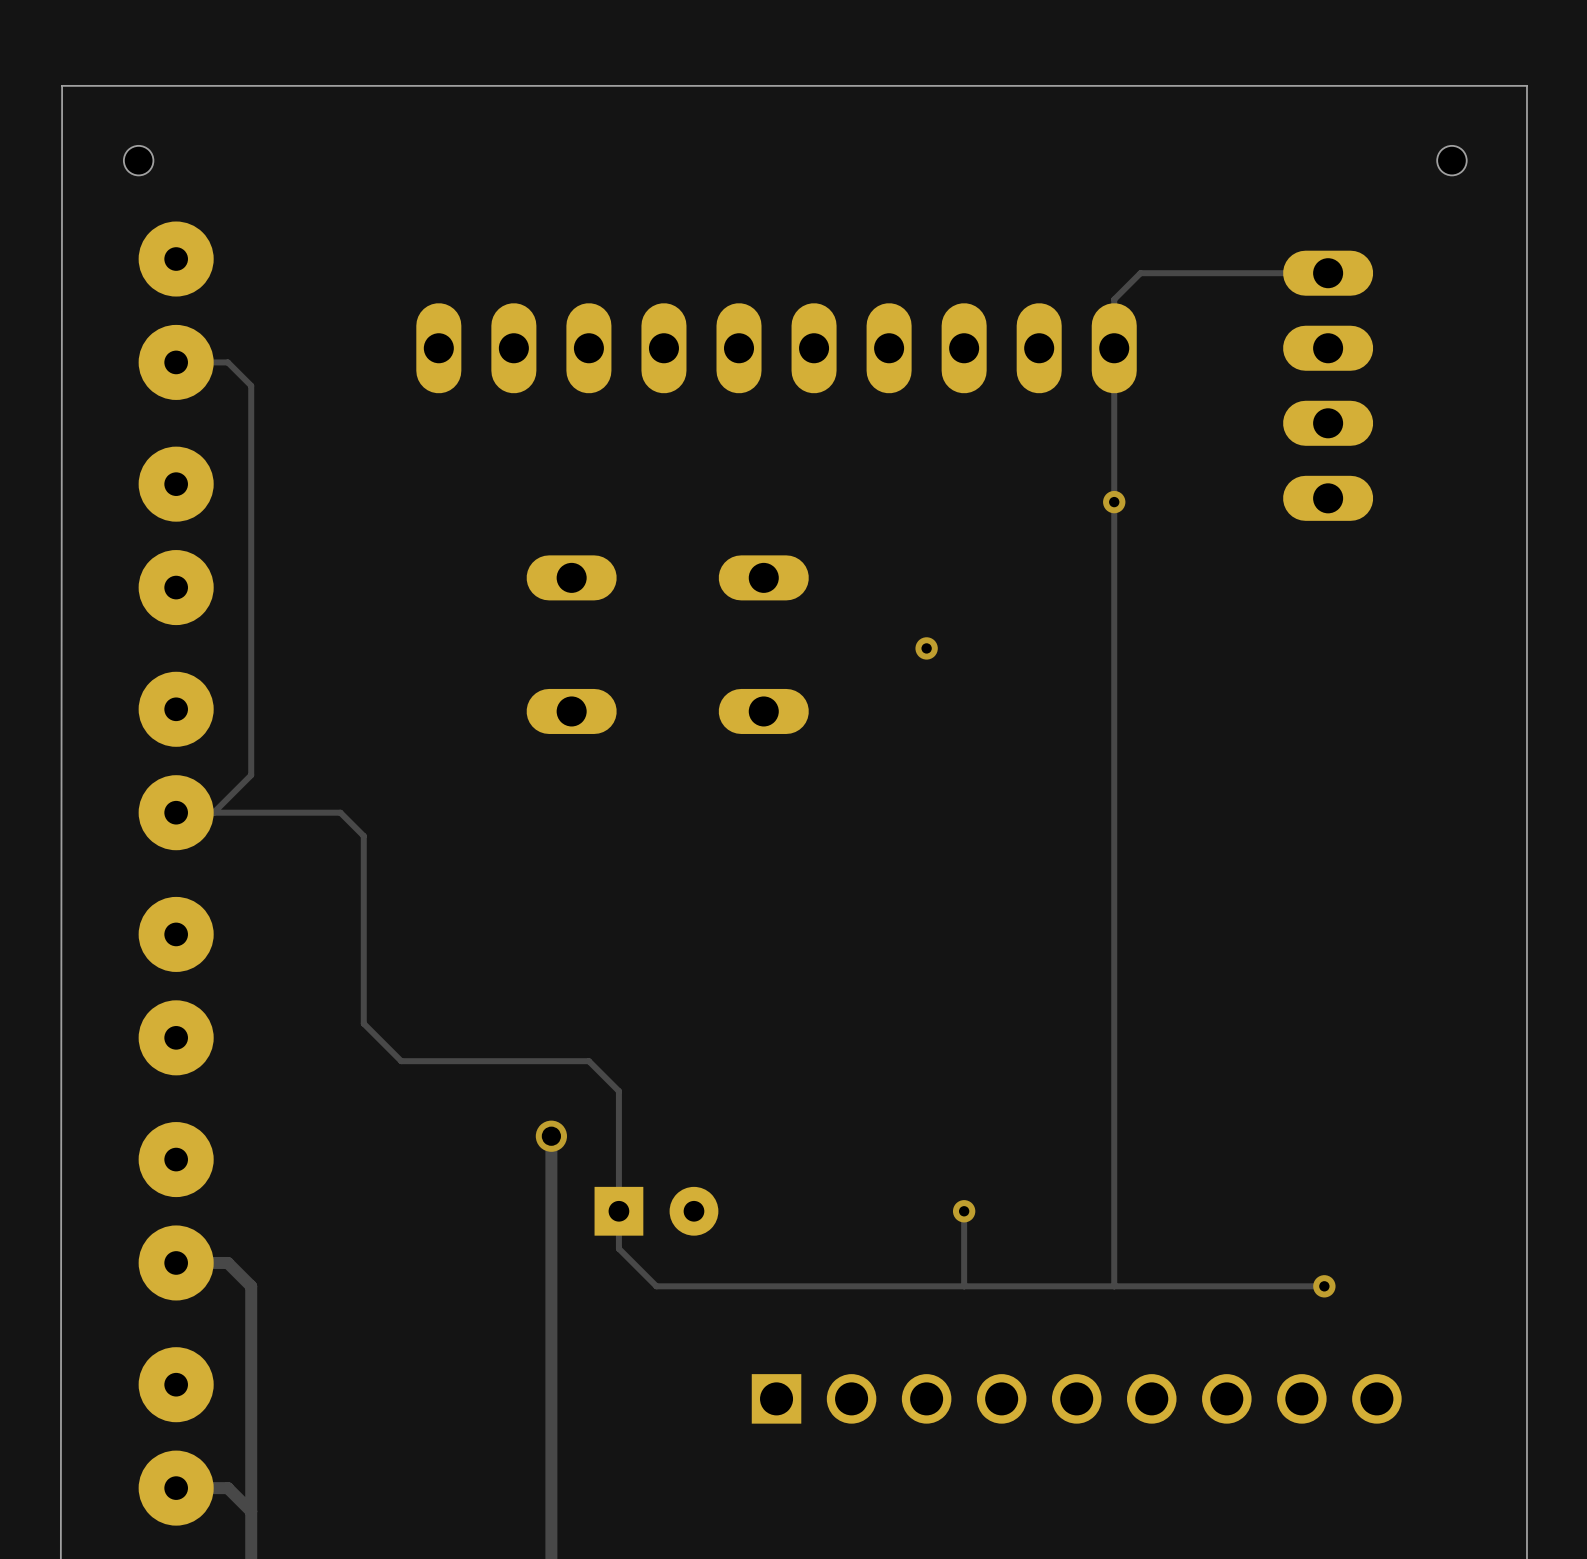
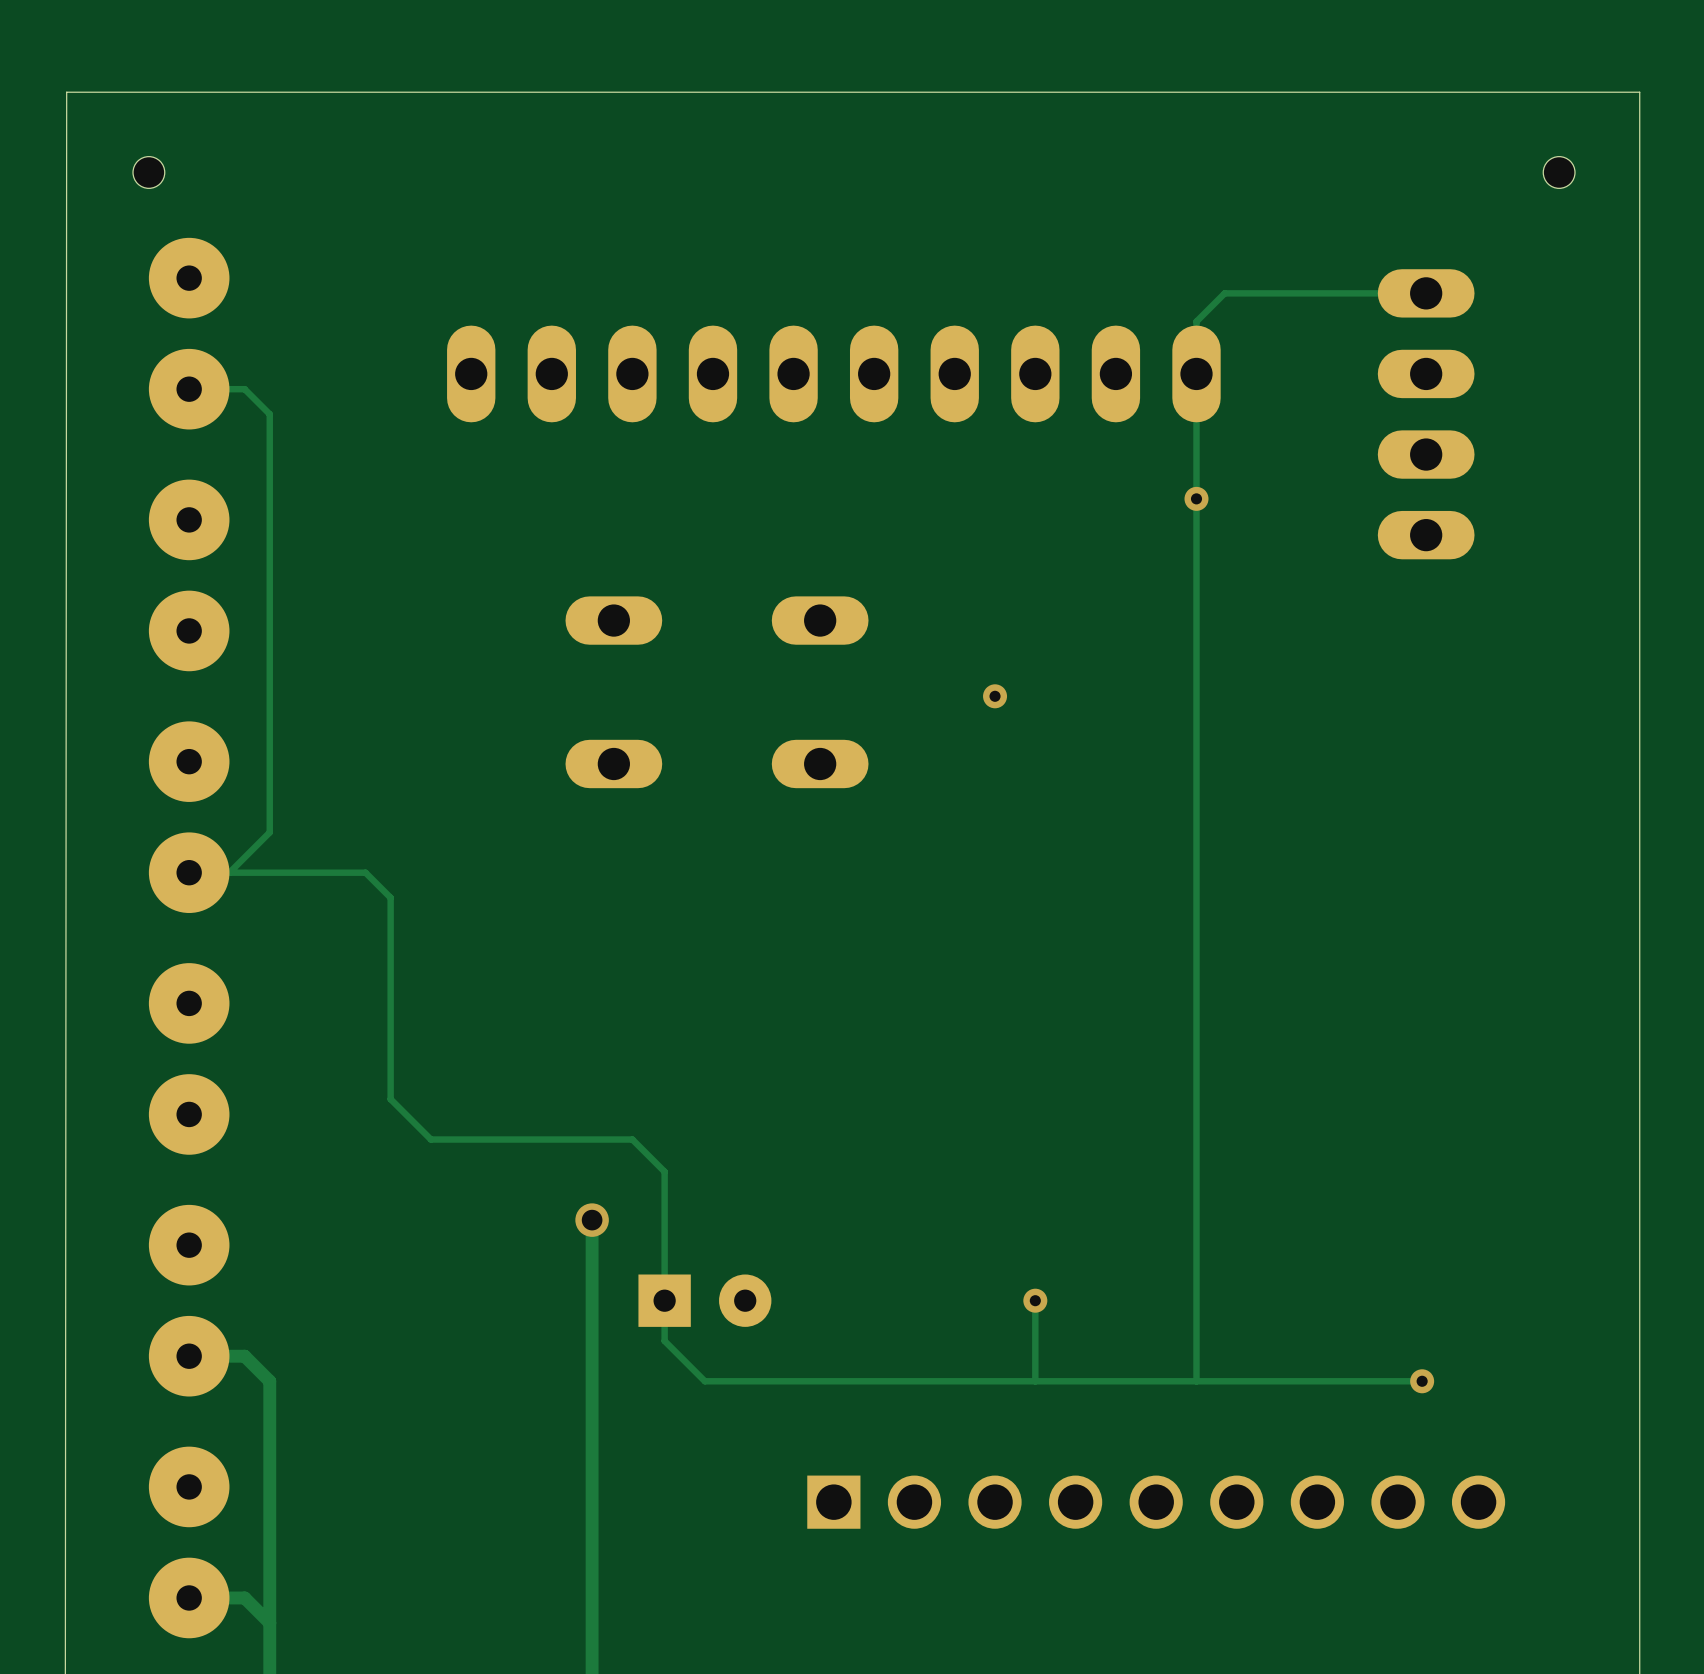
via position: (1114, 502) -> (1196, 498)

